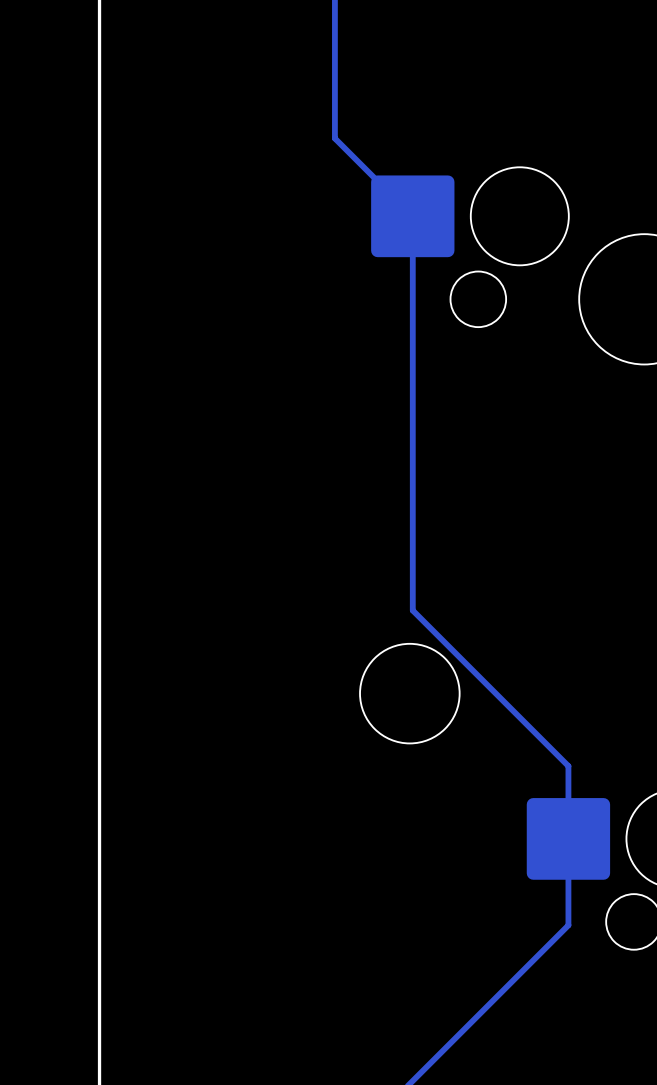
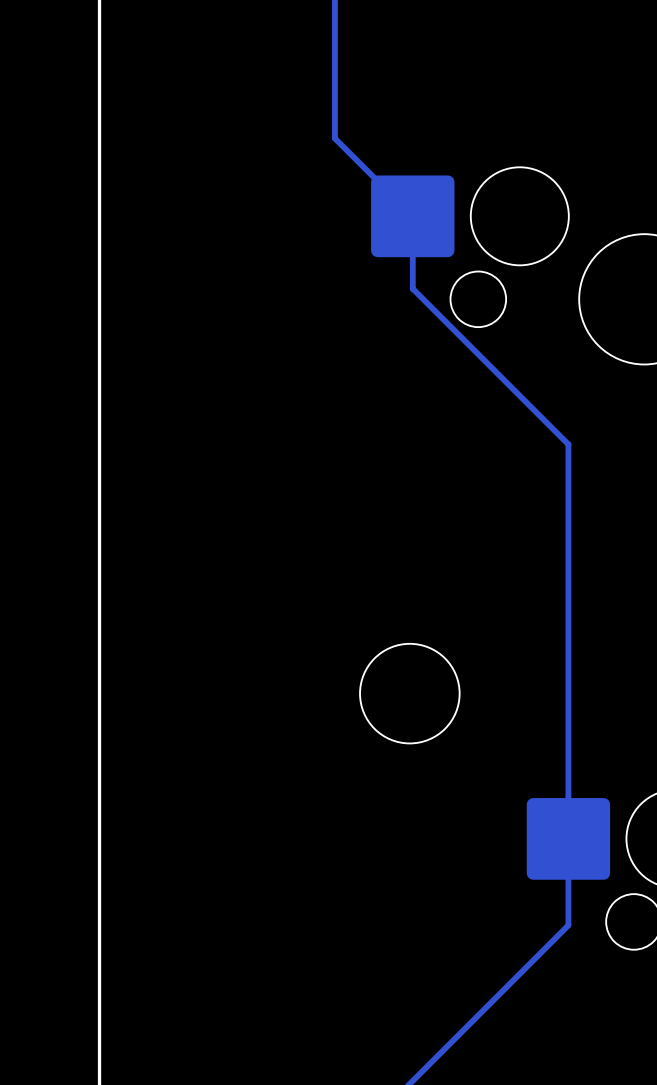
bottom track: (412, 288) (412, 610) (568, 766) -> (412, 288) (568, 444) (568, 766)

